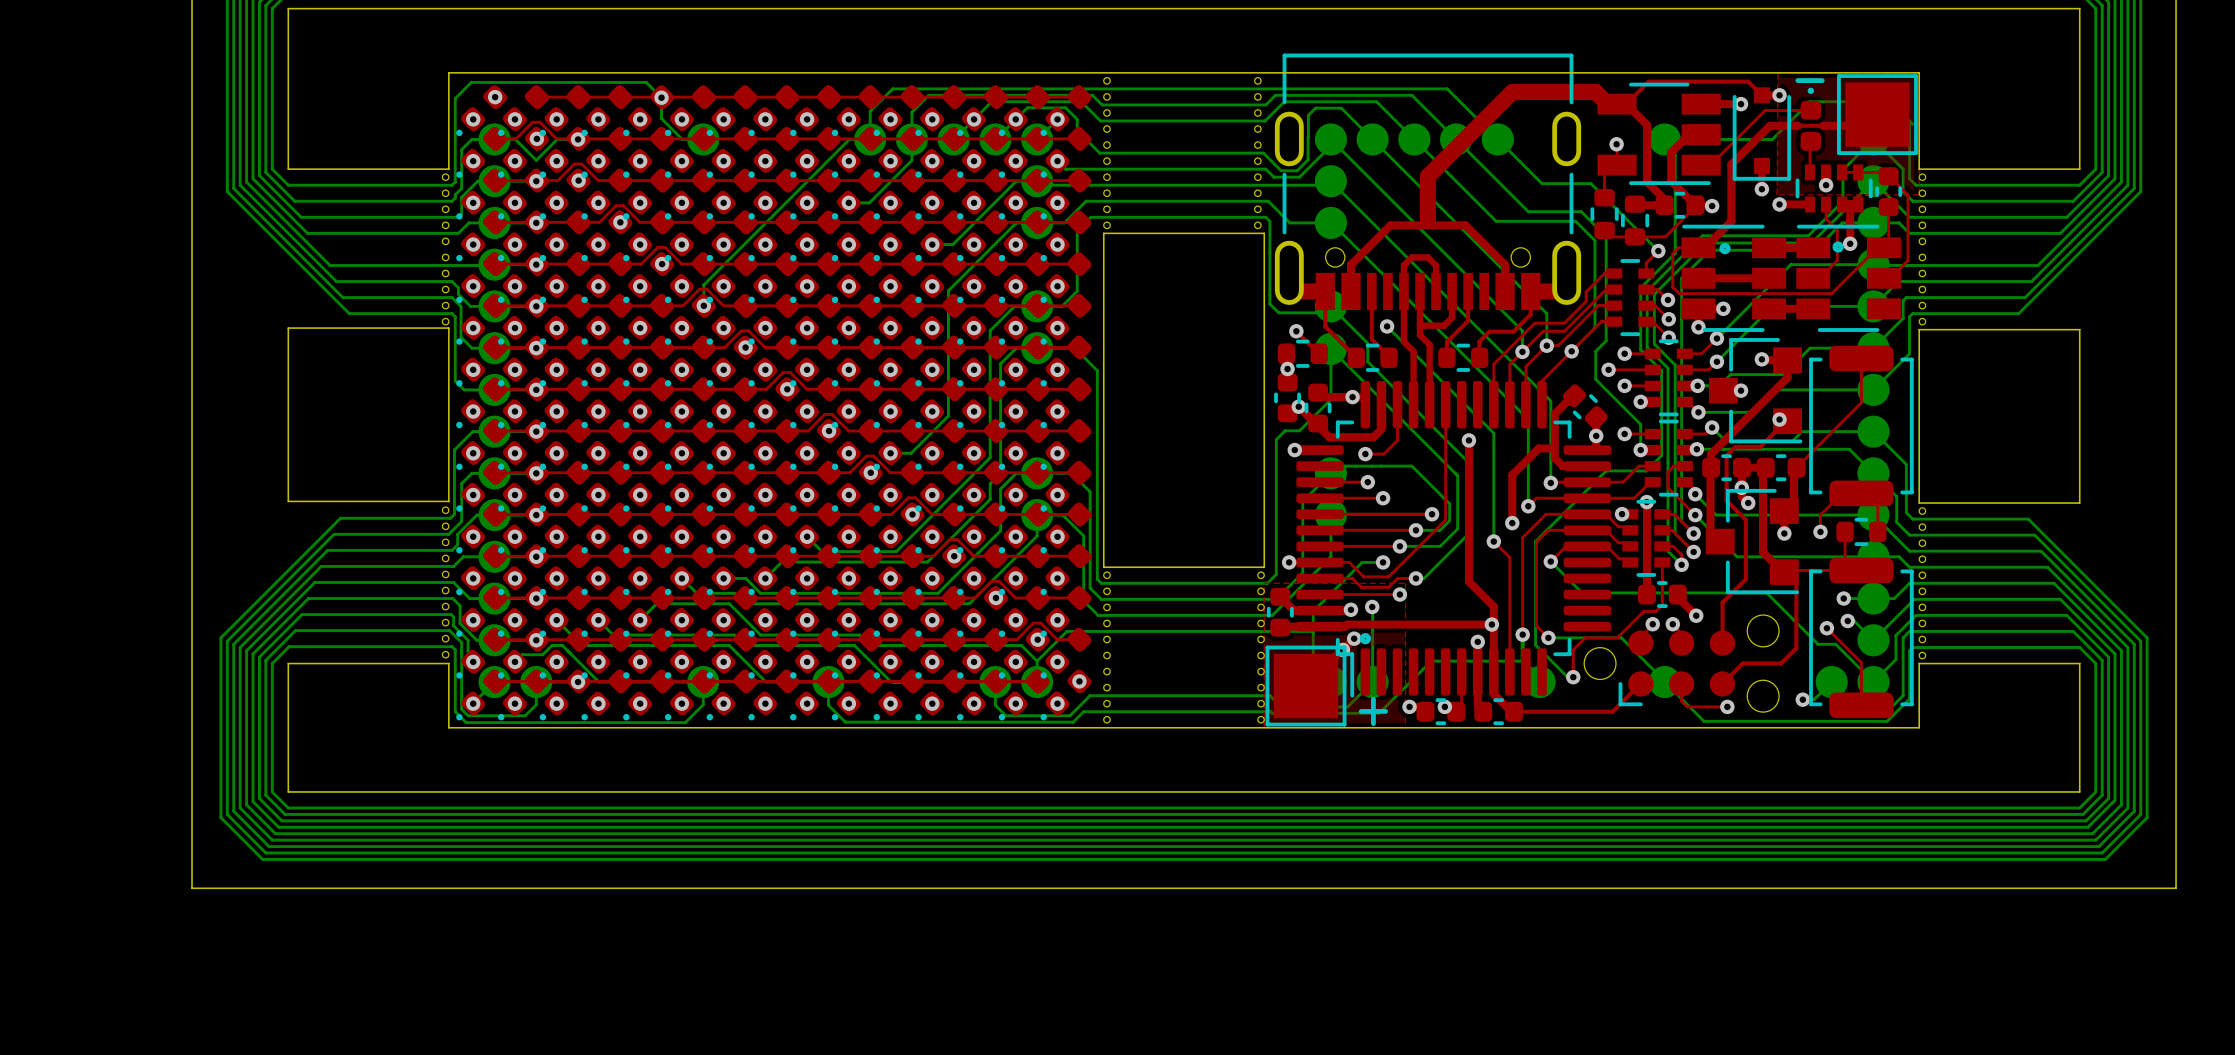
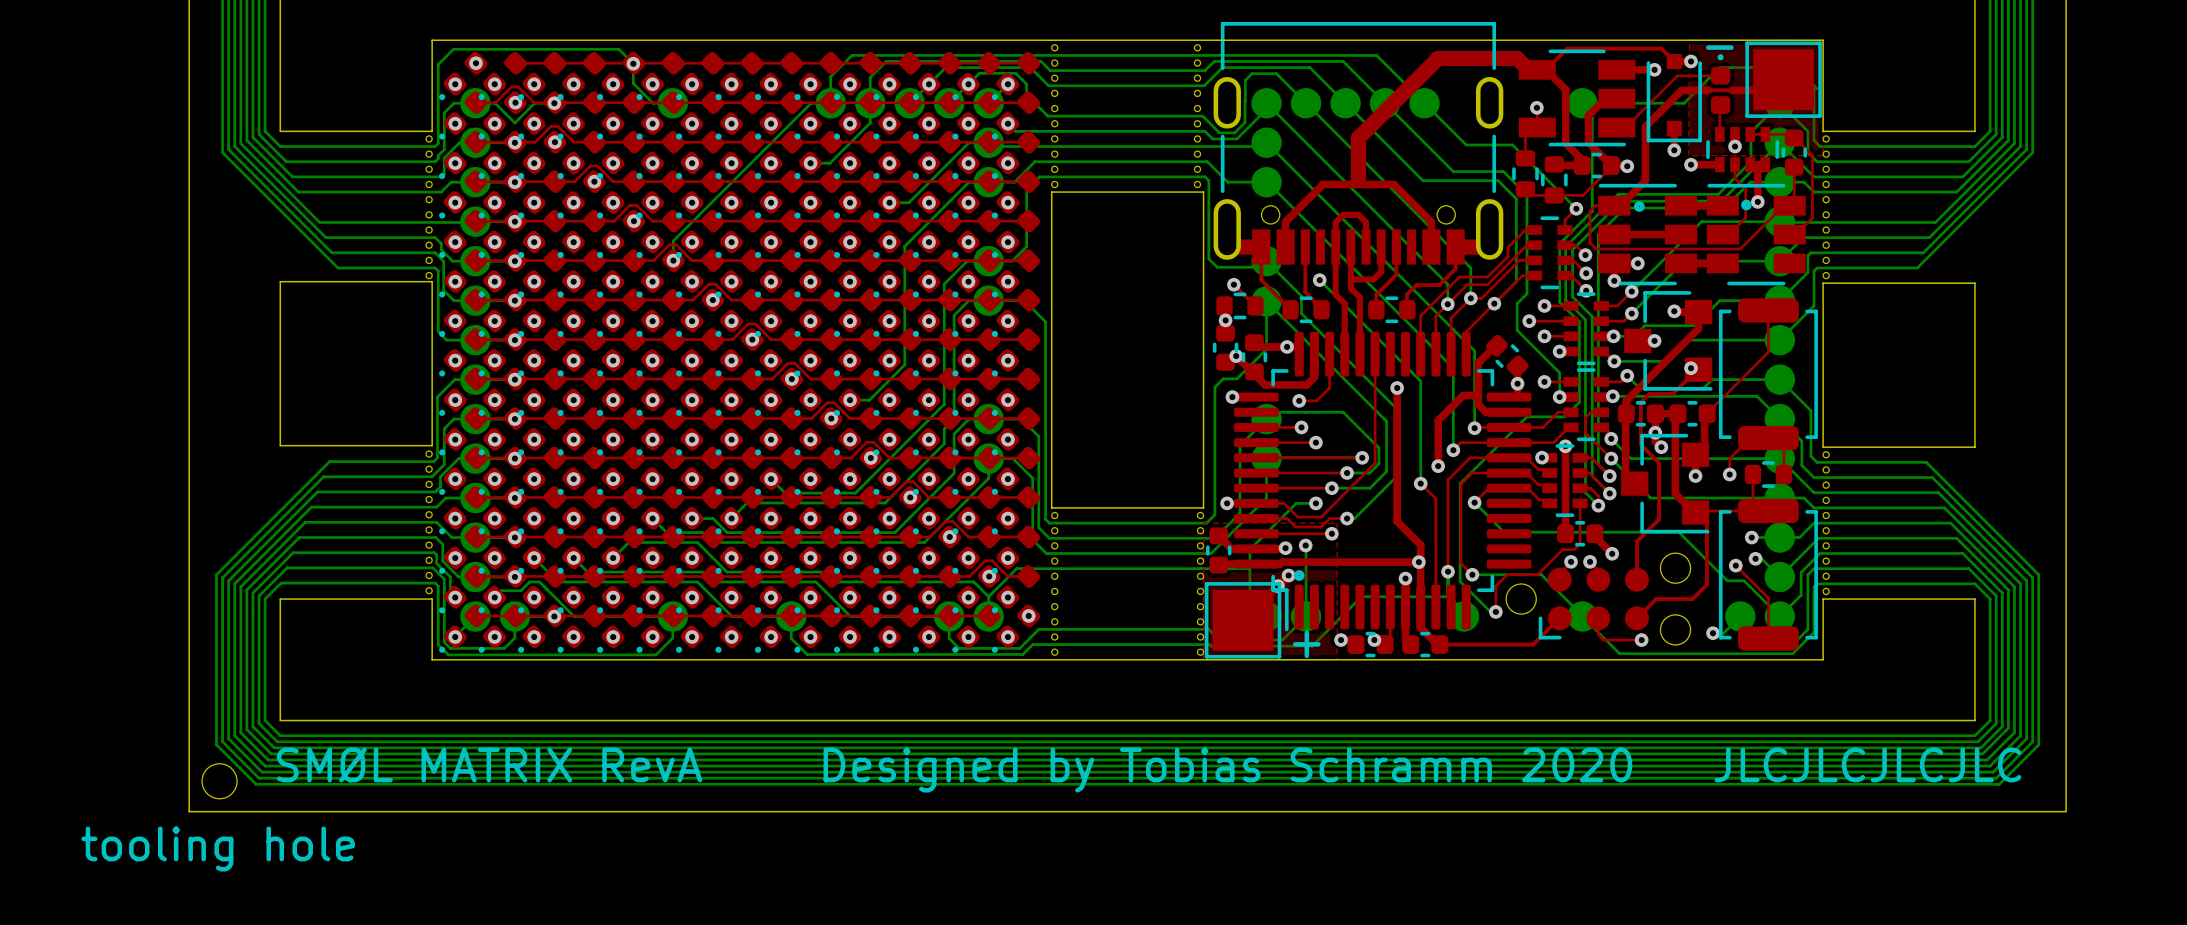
text: none -> JLCJLCJLCJLC (1867, 764)
text: none -> SMØL MATRIX RevA Designed by Tobias Schramm 2020 (954, 770)
part: none -> (219, 781)

